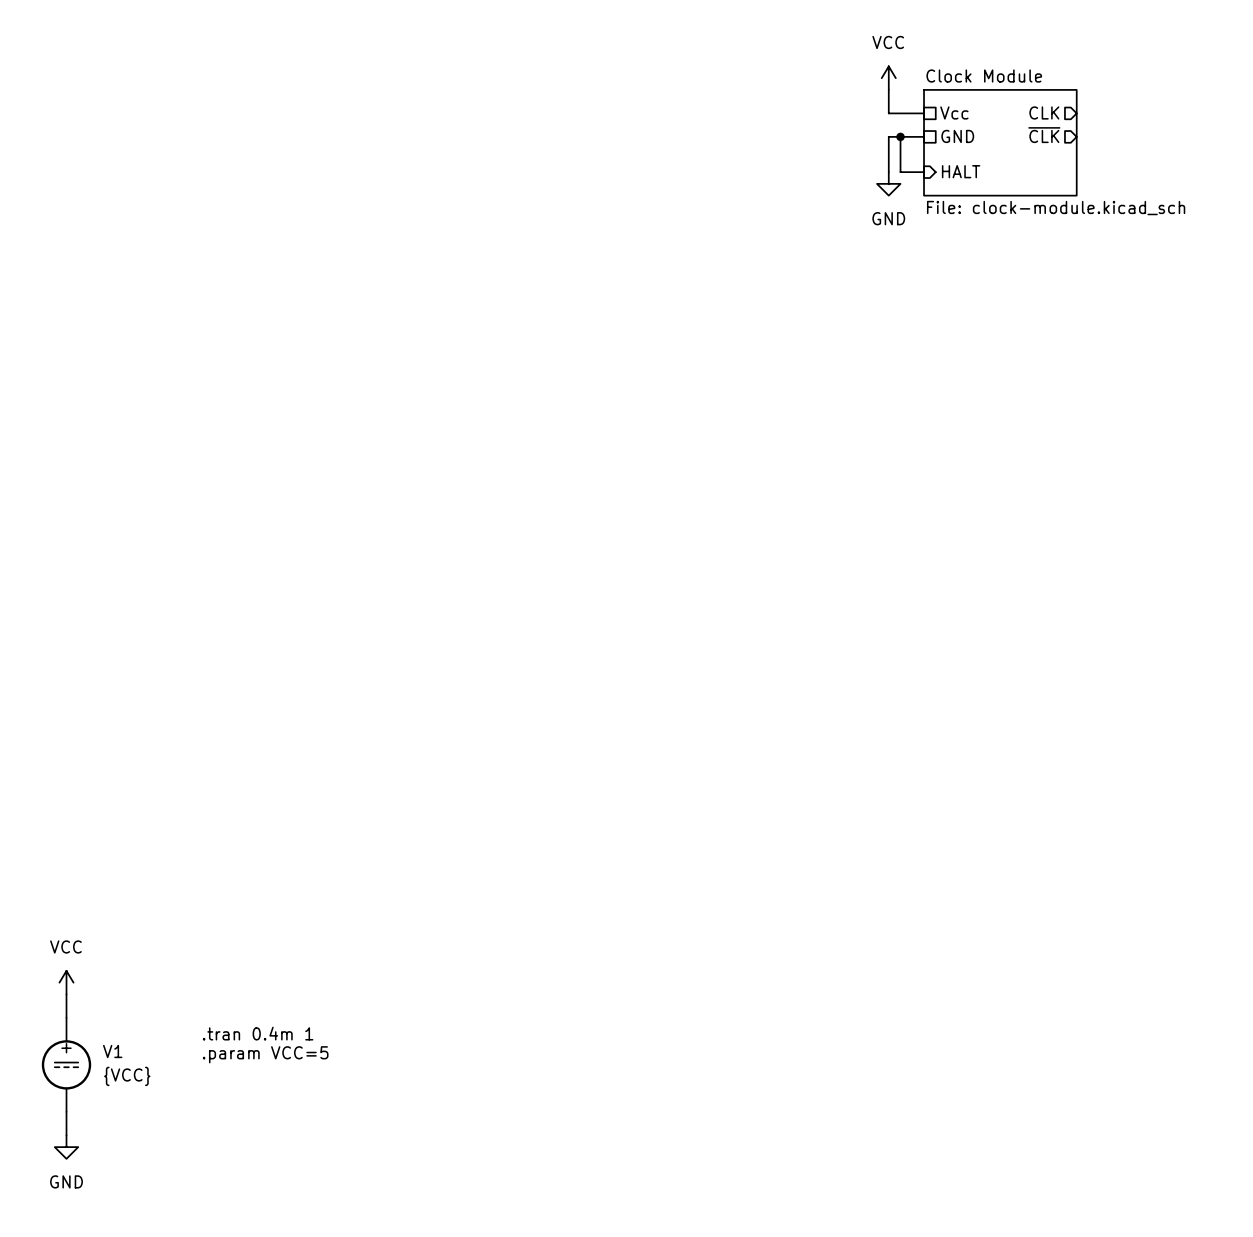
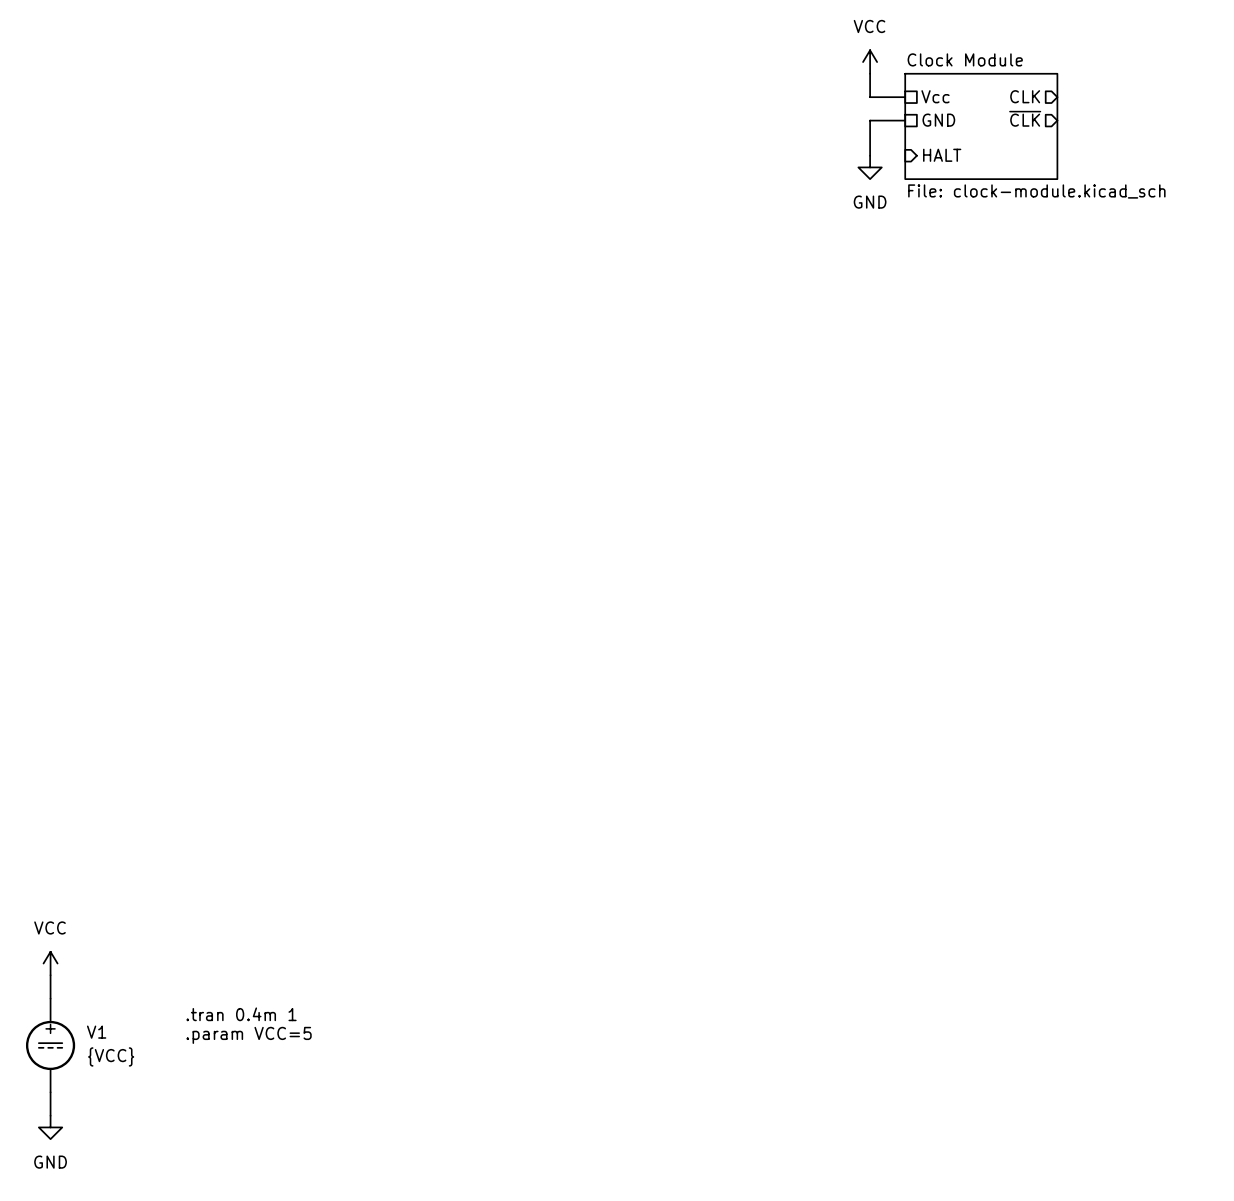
wire: (900, 136) (900, 172) (924, 172) -> none
junction: (900, 136) -> none

